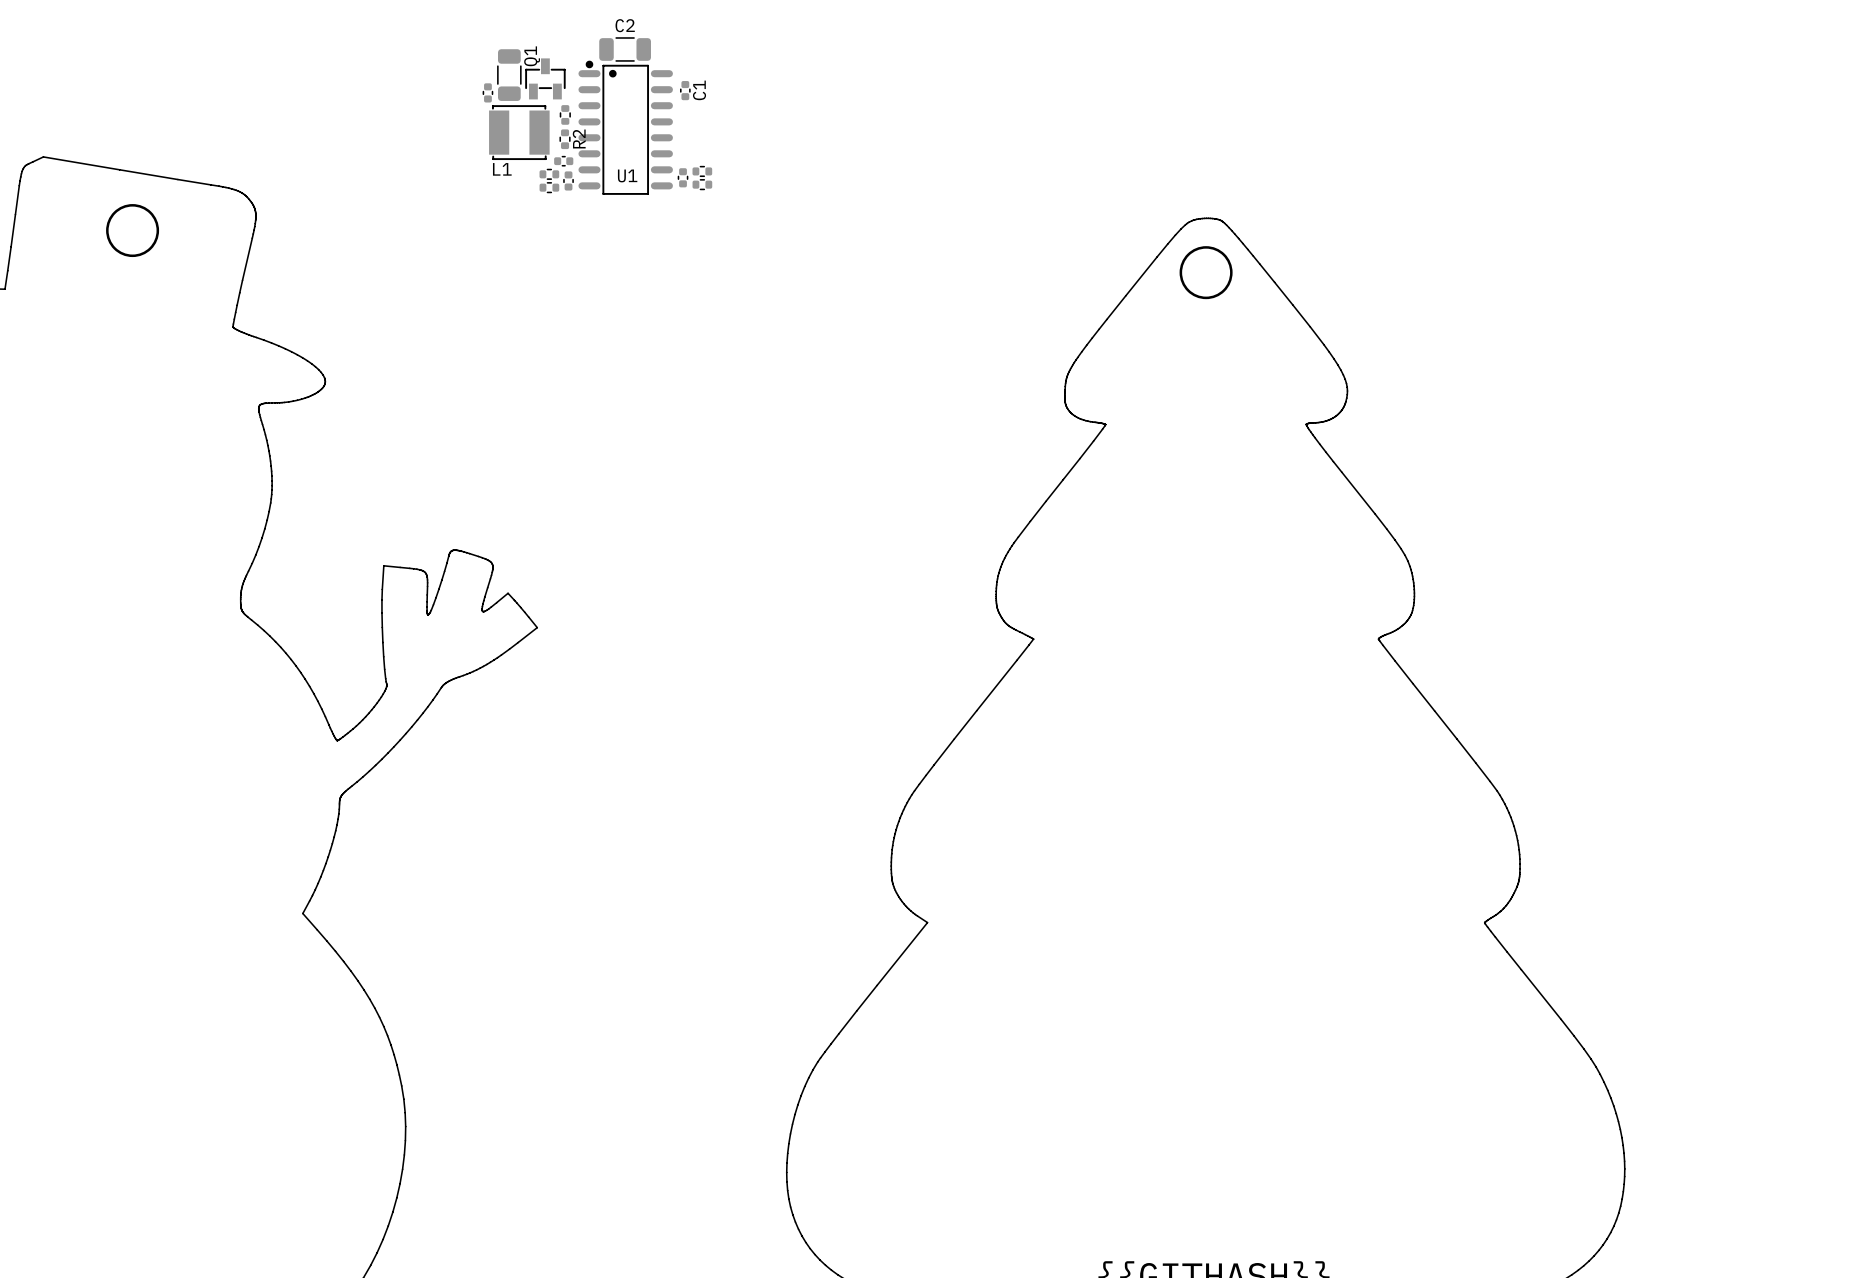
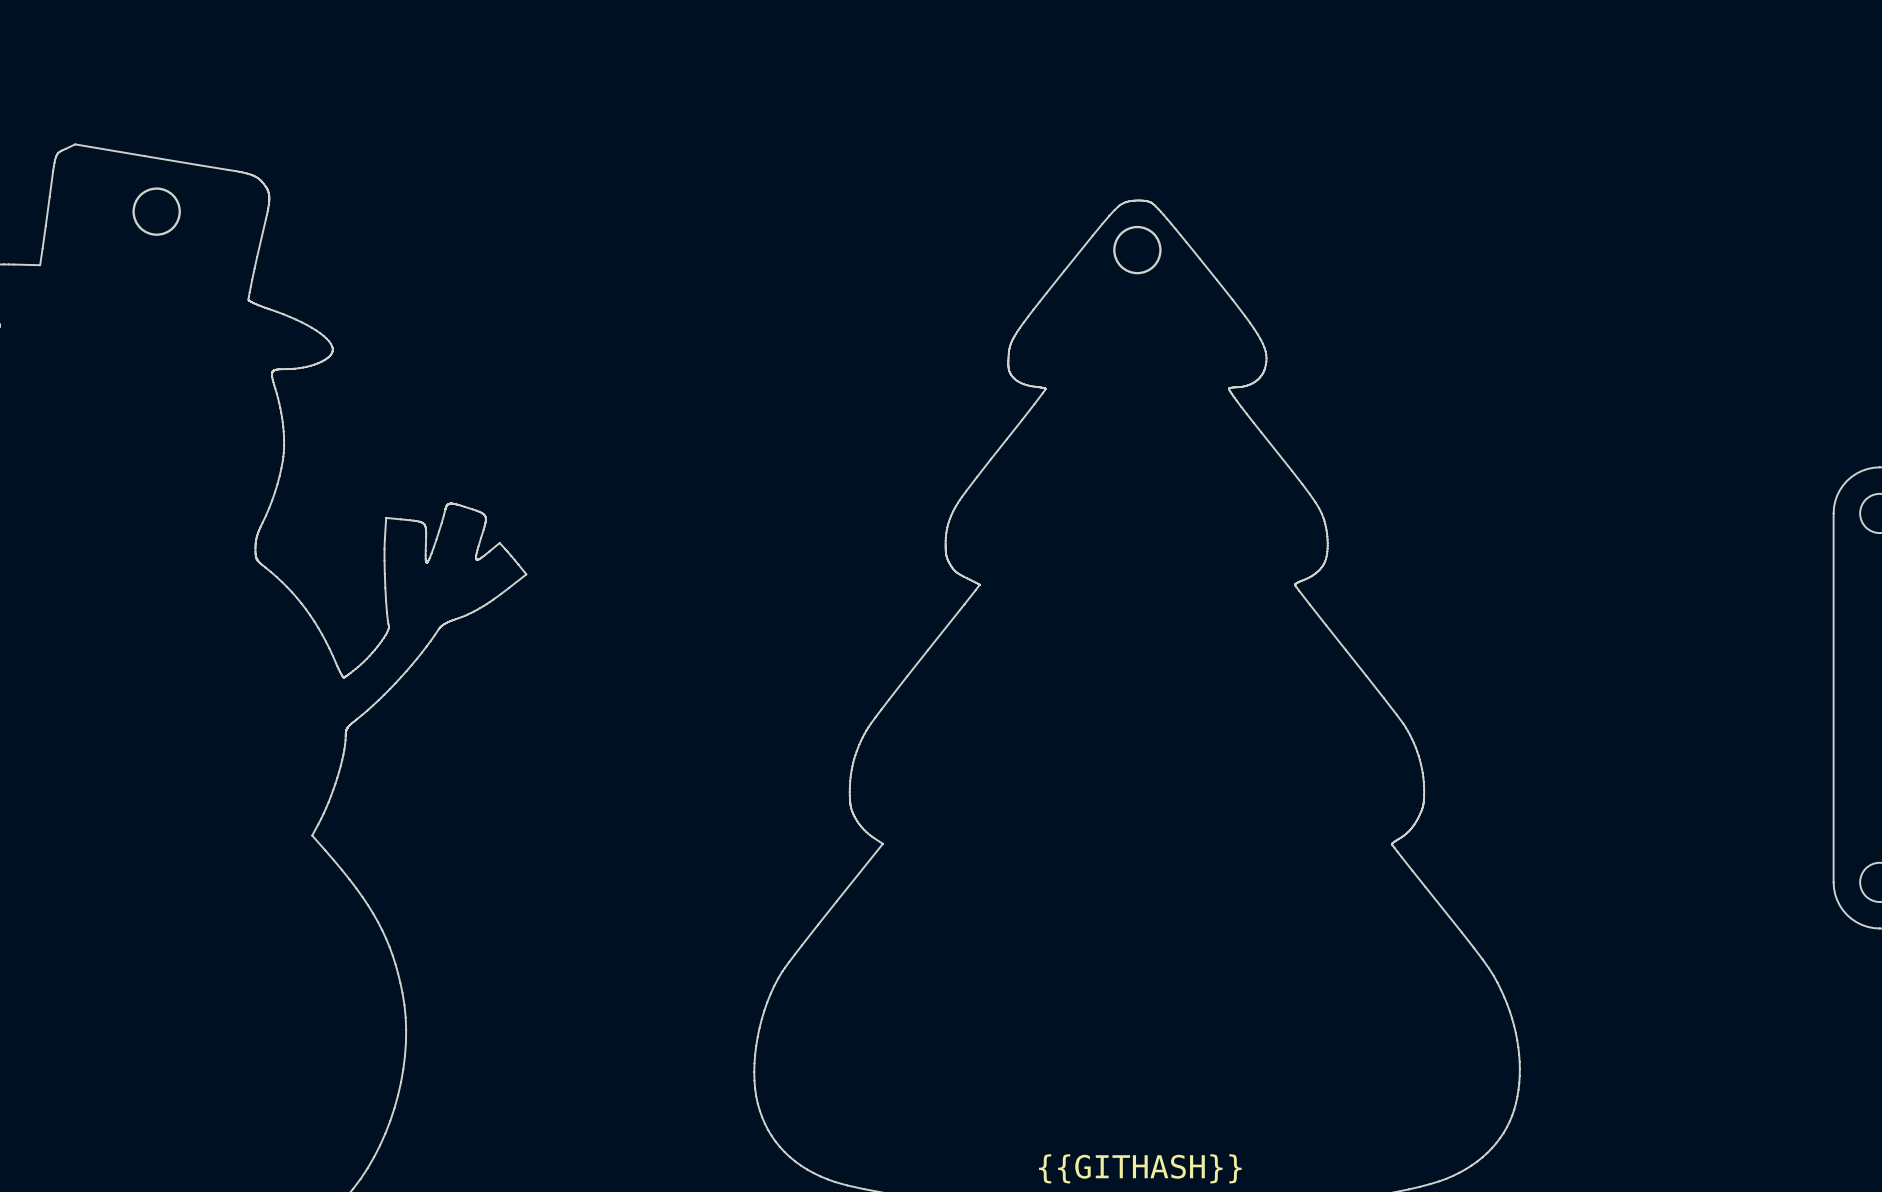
C2: (625, 49) -> none
part: (509, 75) -> none
Q1: (545, 78) -> none
C1: (685, 90) -> none
part: (487, 92) -> none
part: (565, 114) -> none
U1: (625, 127) -> none
L1: (519, 132) -> none
R2: (565, 139) -> none
part: (563, 161) -> none
part: (702, 171) -> none
part: (549, 174) -> none
part: (683, 177) -> none
part: (568, 180) -> none
part: (702, 184) -> none
part: (549, 187) -> none

